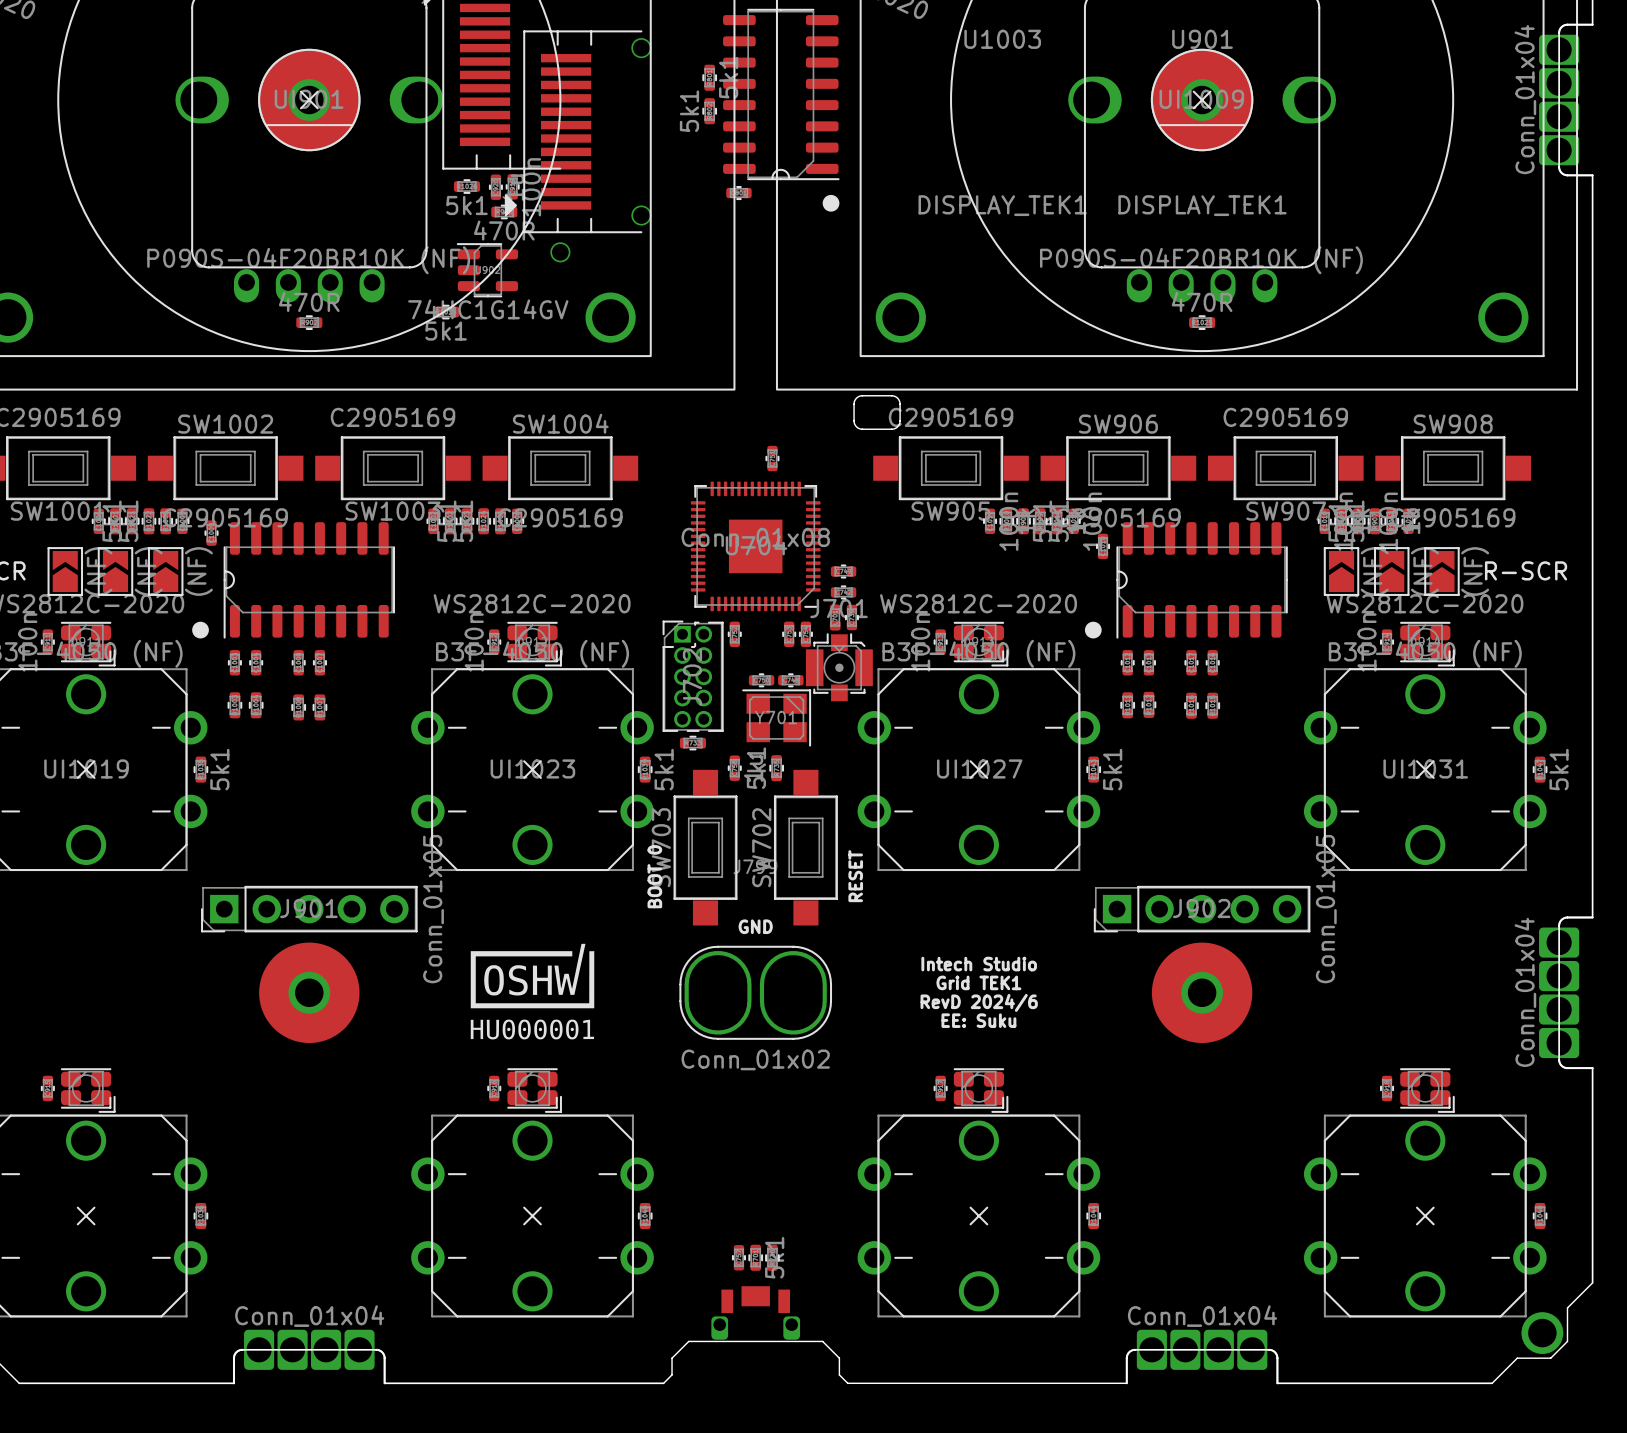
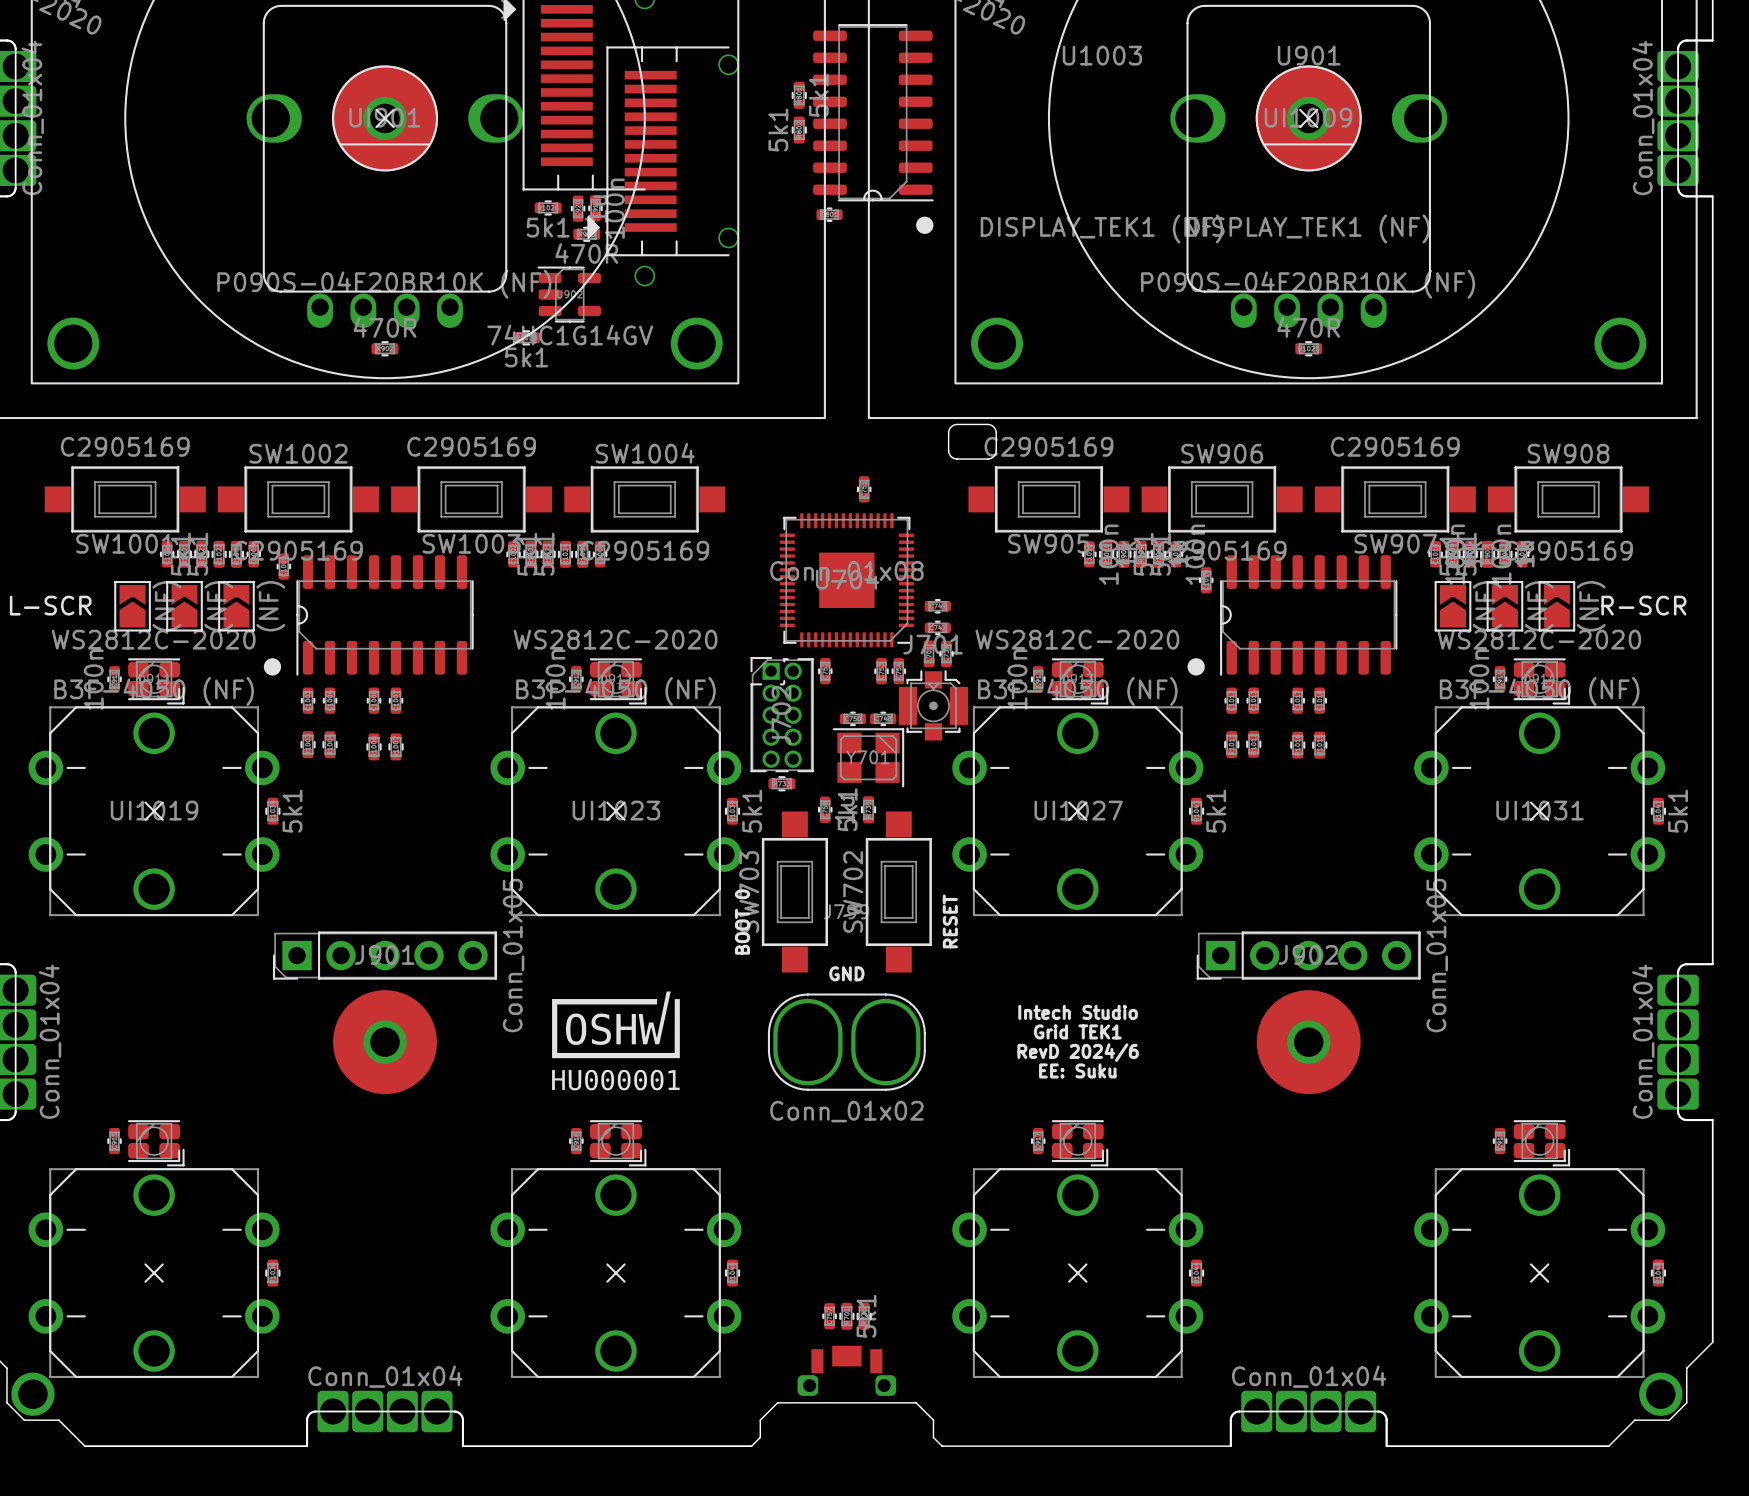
U1003 value: DISPLAY_TEK1 (1002, 205) -> DISPLAY_TEK1 (NF) (1101, 228)
U901 value: DISPLAY_TEK1 (1202, 205) -> DISPLAY_TEK1 (NF) (1308, 228)
part footprint: [711, 1286, 801, 1340] -> [797, 1345, 897, 1396]

